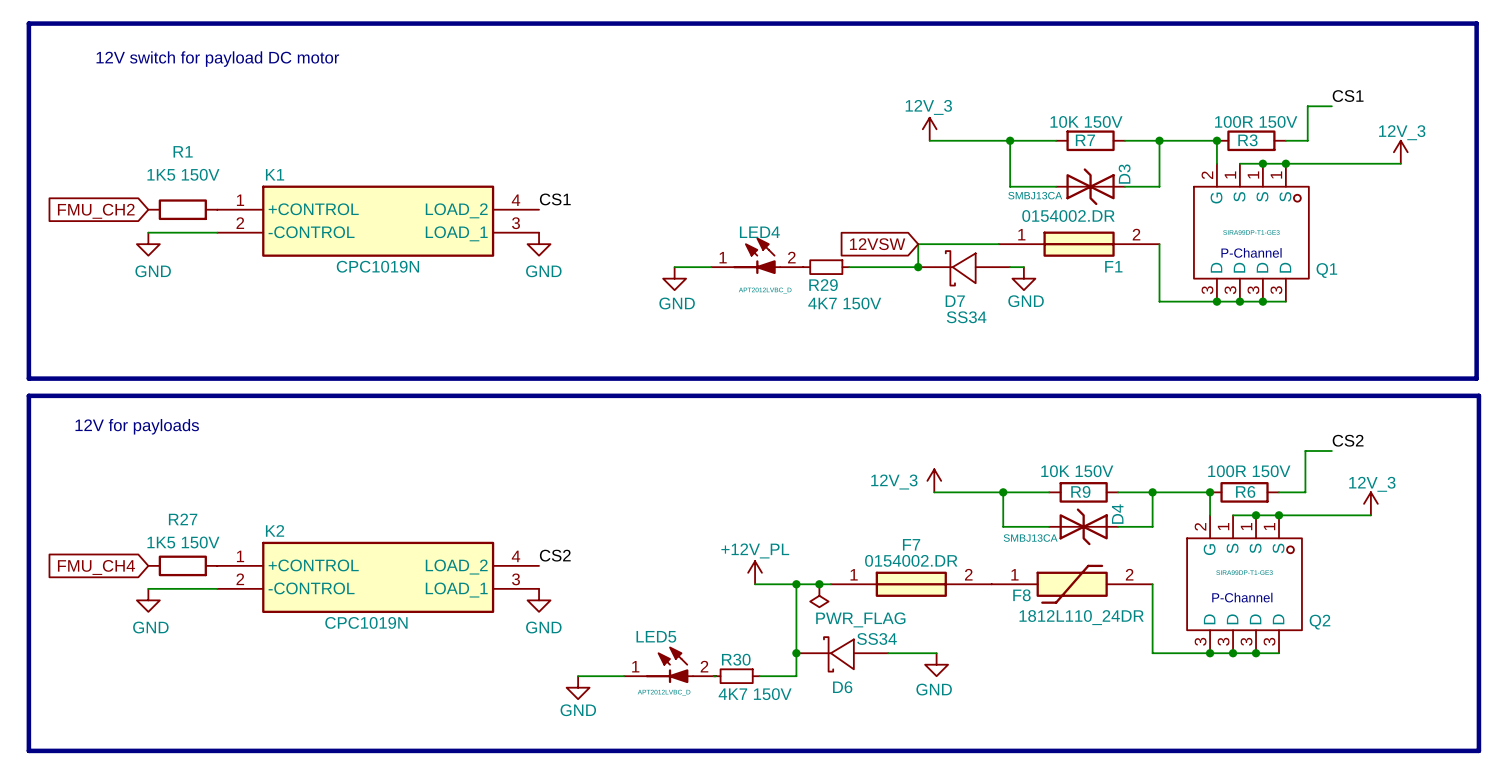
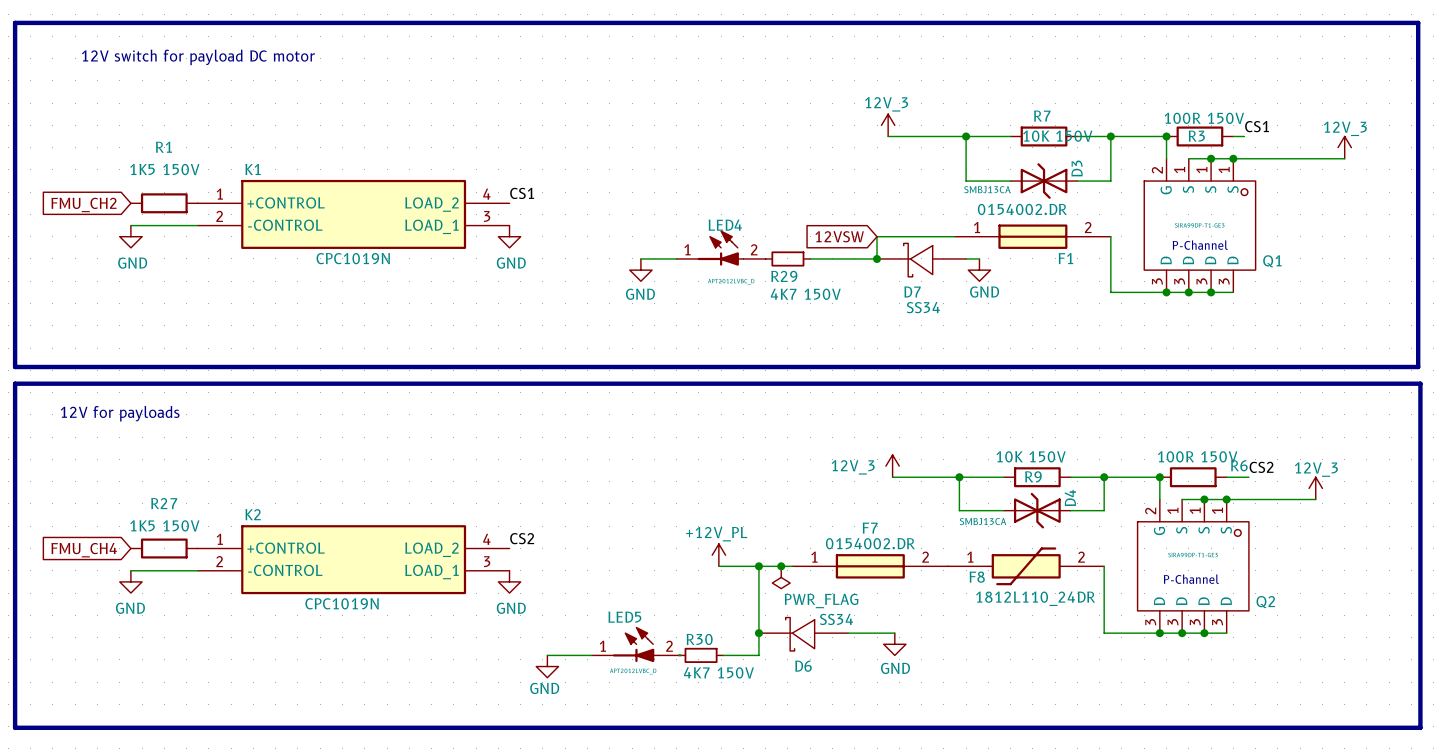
label position: CS1 (1348, 96) -> CS1 (1257, 126)
wire: (1331, 106) (1307, 106) (1307, 140) (1297, 140) -> none
R7 value position: 10K 150V (1086, 121) -> 10K 150V (1057, 136)
R7 name position: R7 (1085, 140) -> R7 (1042, 116)
label position: CS2 (1348, 440) -> CS2 (1261, 467)
wire: (1331, 451) (1305, 451) (1305, 492) (1301, 492) -> none
R6 name position: R6 (1245, 491) -> R6 (1239, 465)

